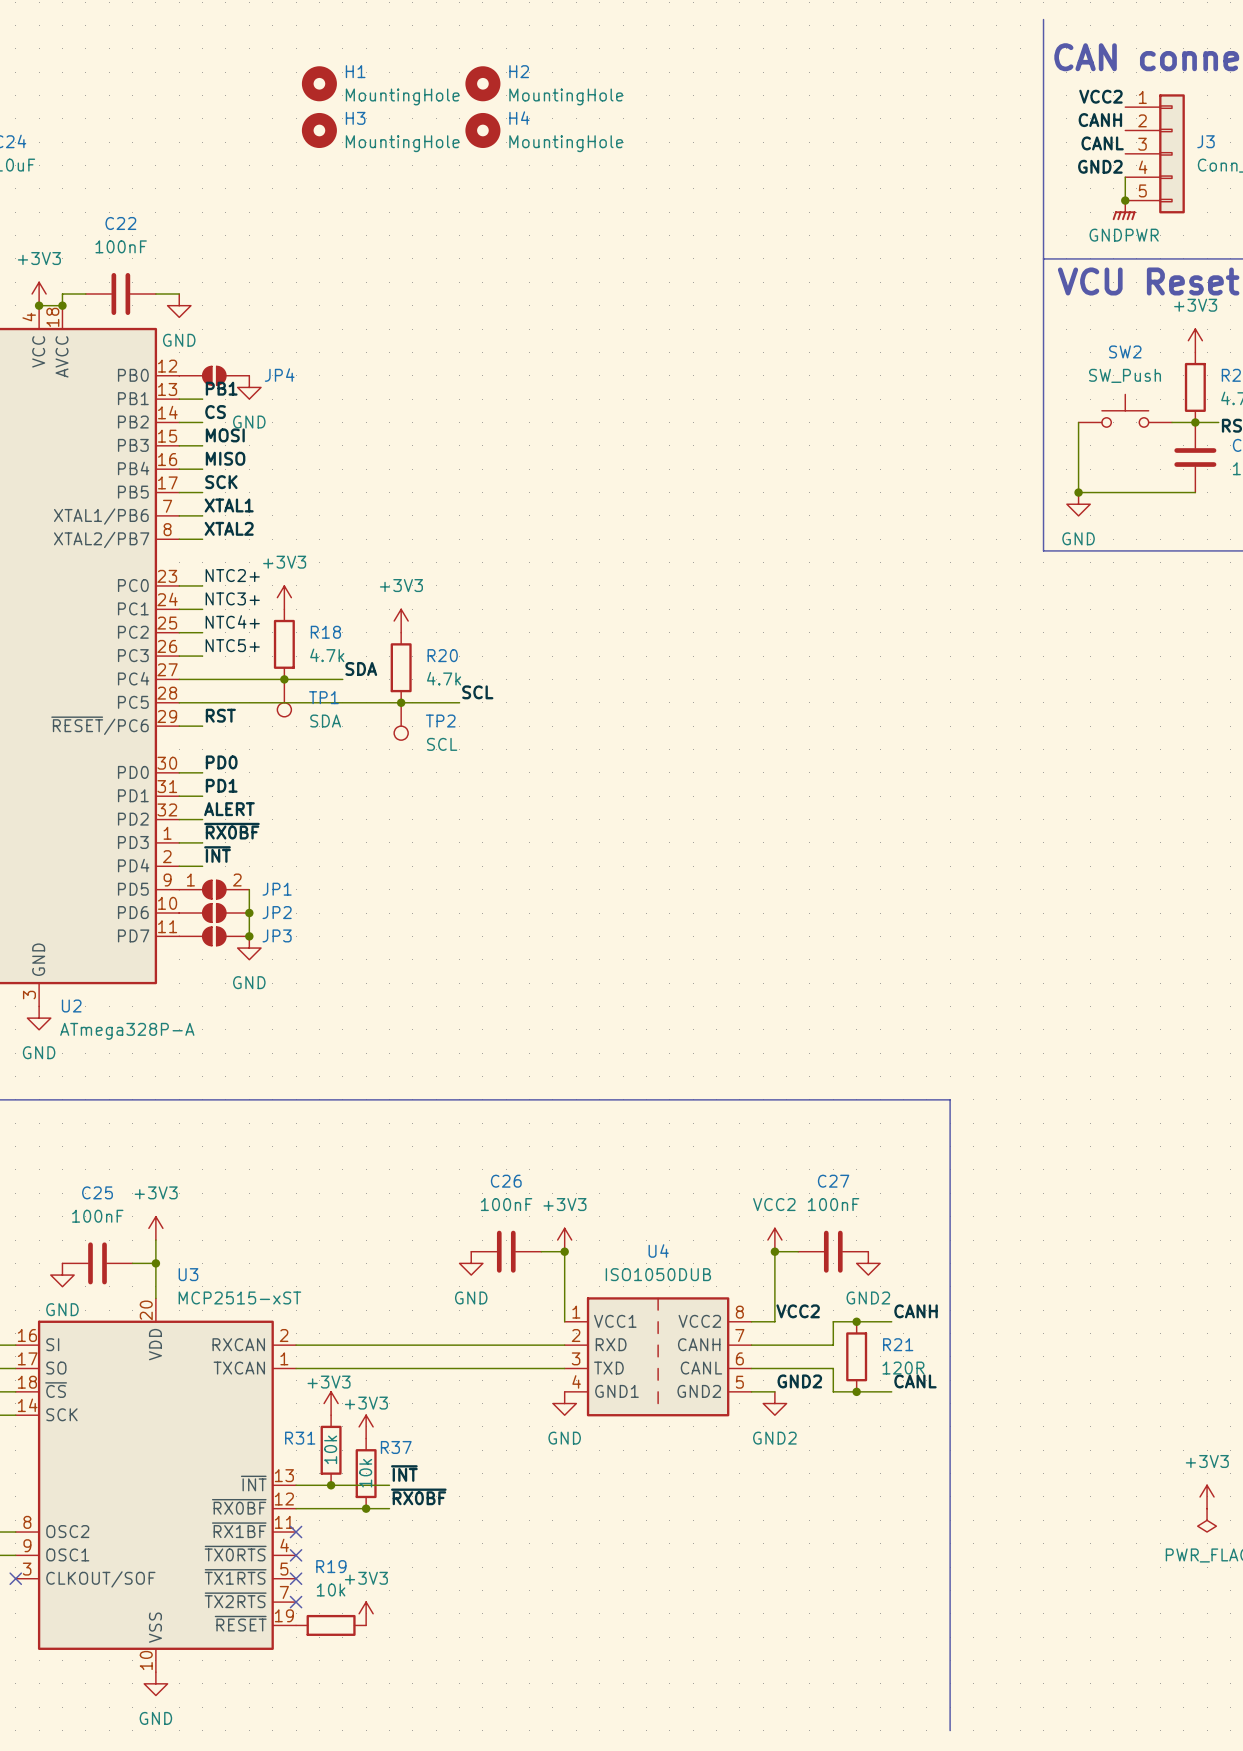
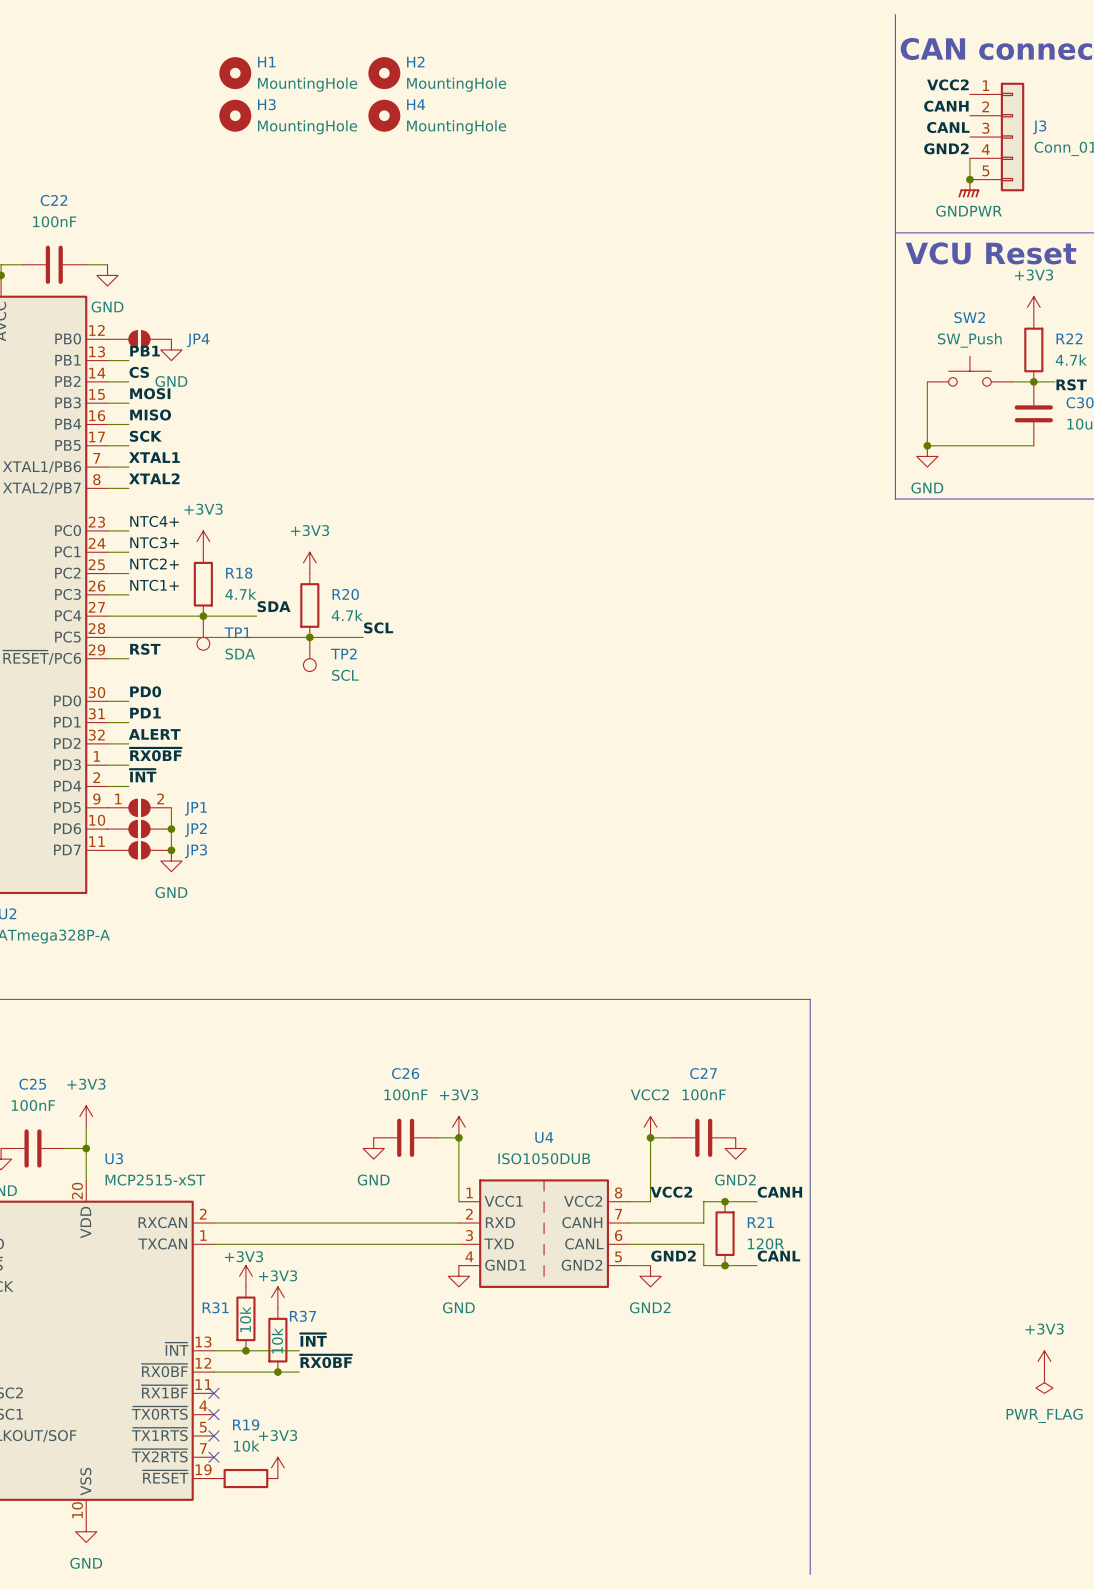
label: NTC2+ (232, 575) -> NTC4+ (154, 521)
label: NTC4+ (232, 622) -> NTC2+ (154, 564)
label: NTC5+ (232, 645) -> NTC1+ (154, 585)

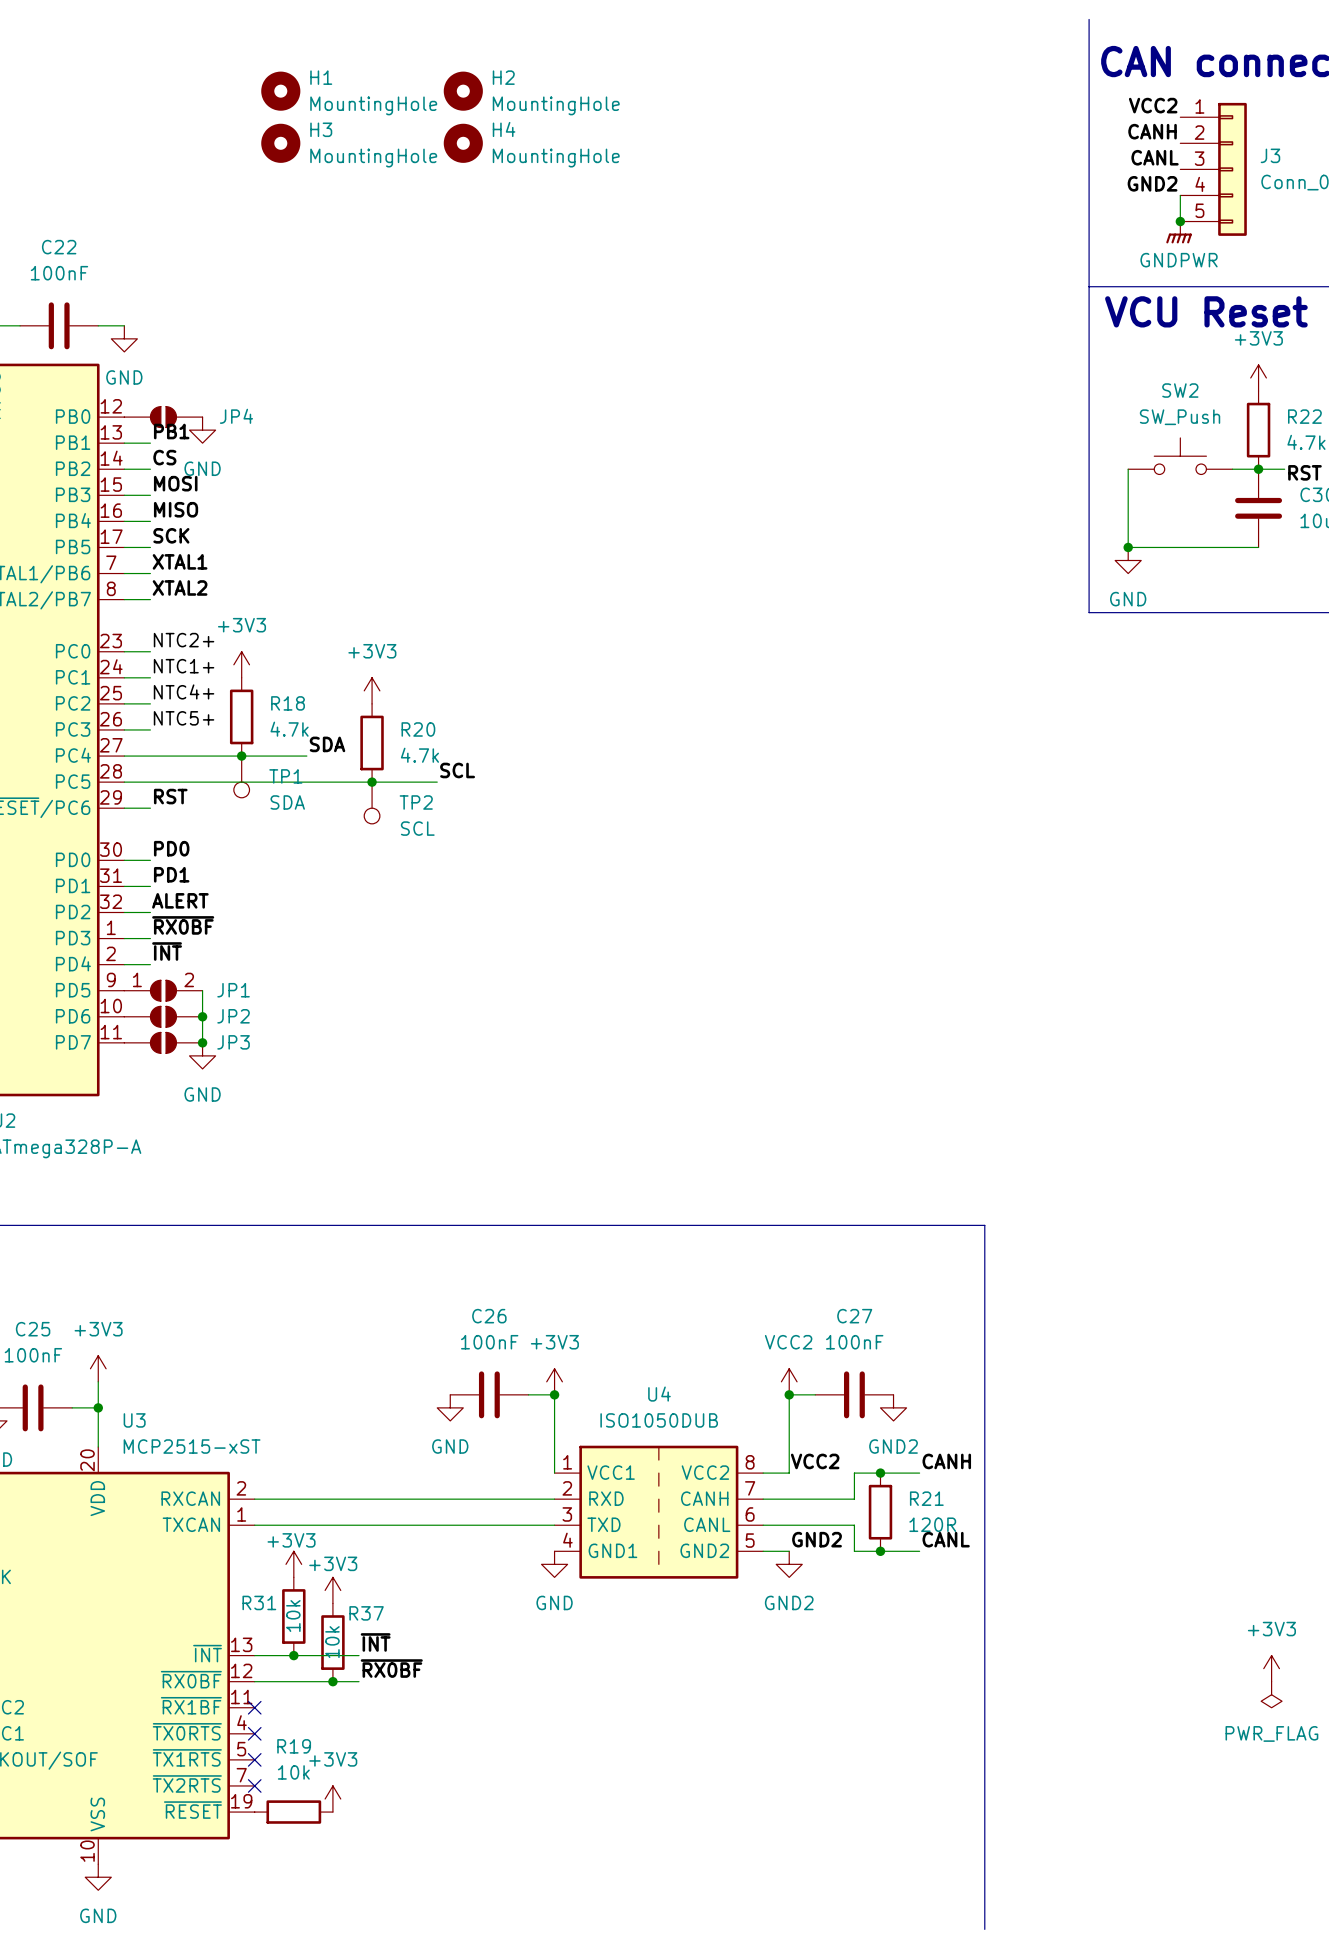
label: NTC4+ (154, 521) -> NTC2+ (184, 640)
label: NTC3+ (154, 542) -> NTC1+ (184, 666)
label: NTC2+ (154, 564) -> NTC4+ (184, 691)
label: NTC1+ (154, 585) -> NTC5+ (184, 718)

